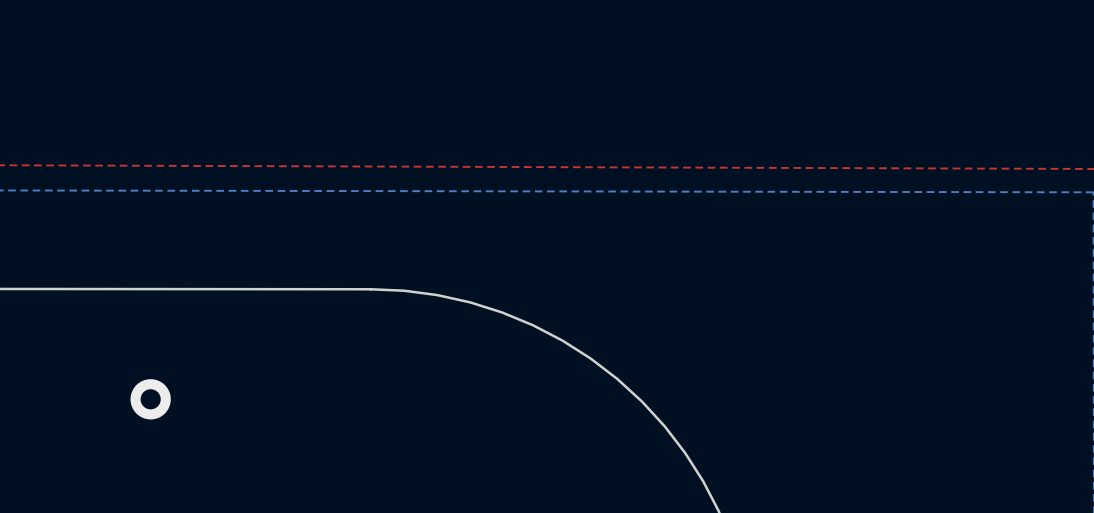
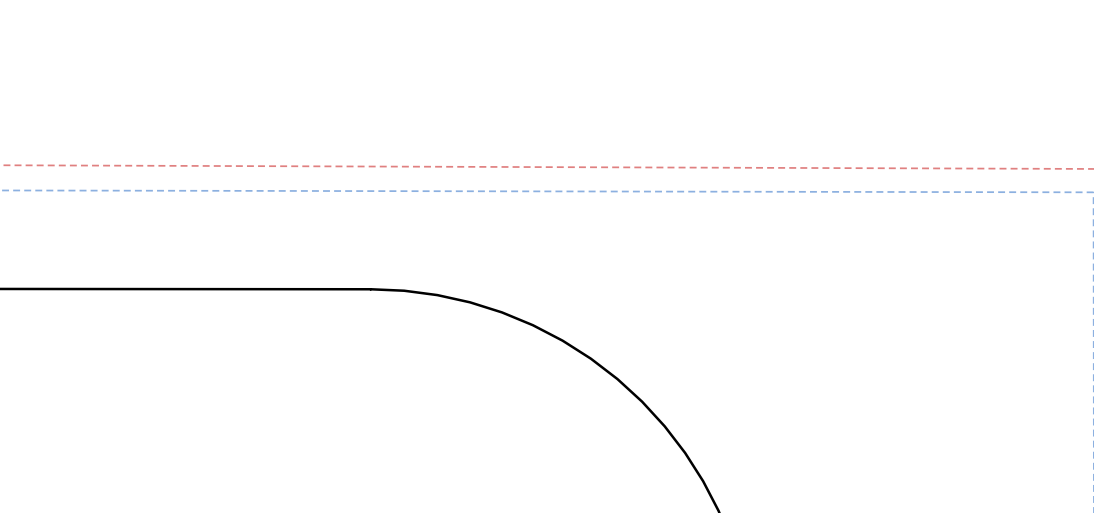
via: (150, 399) -> none

